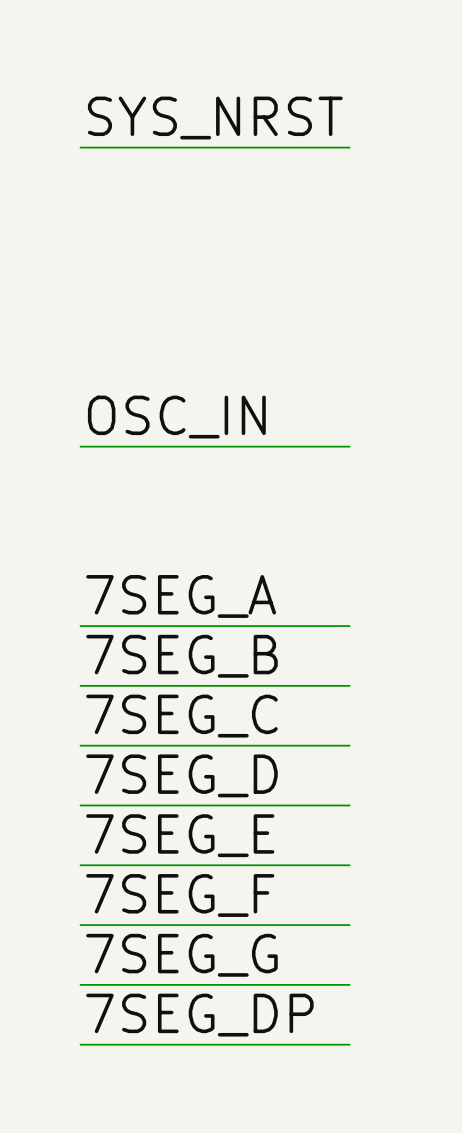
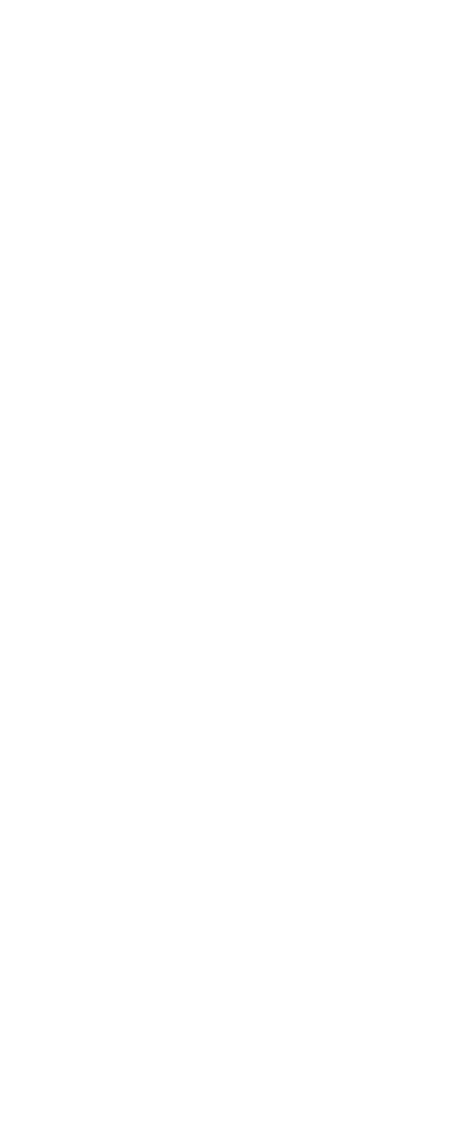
label: SYS_NRST (215, 118) -> none
wire: (80, 147) (349, 147) -> none
label: OSC_IN (176, 417) -> none
wire: (80, 446) (349, 446) -> none
label: 7SEG_A (181, 596) -> none
wire: (80, 626) (349, 626) -> none
label: 7SEG_B (181, 656) -> none
wire: (80, 685) (349, 685) -> none
label: 7SEG_C (181, 716) -> none
wire: (80, 745) (349, 745) -> none
label: 7SEG_D (181, 775) -> none
wire: (80, 805) (349, 805) -> none
label: 7SEG_E (180, 835) -> none
wire: (80, 865) (349, 865) -> none
label: 7SEG_F (180, 895) -> none
wire: (80, 925) (349, 925) -> none
label: 7SEG_G (181, 955) -> none
wire: (80, 984) (349, 984) -> none
label: 7SEG_DP (199, 1015) -> none
wire: (80, 1044) (349, 1044) -> none

